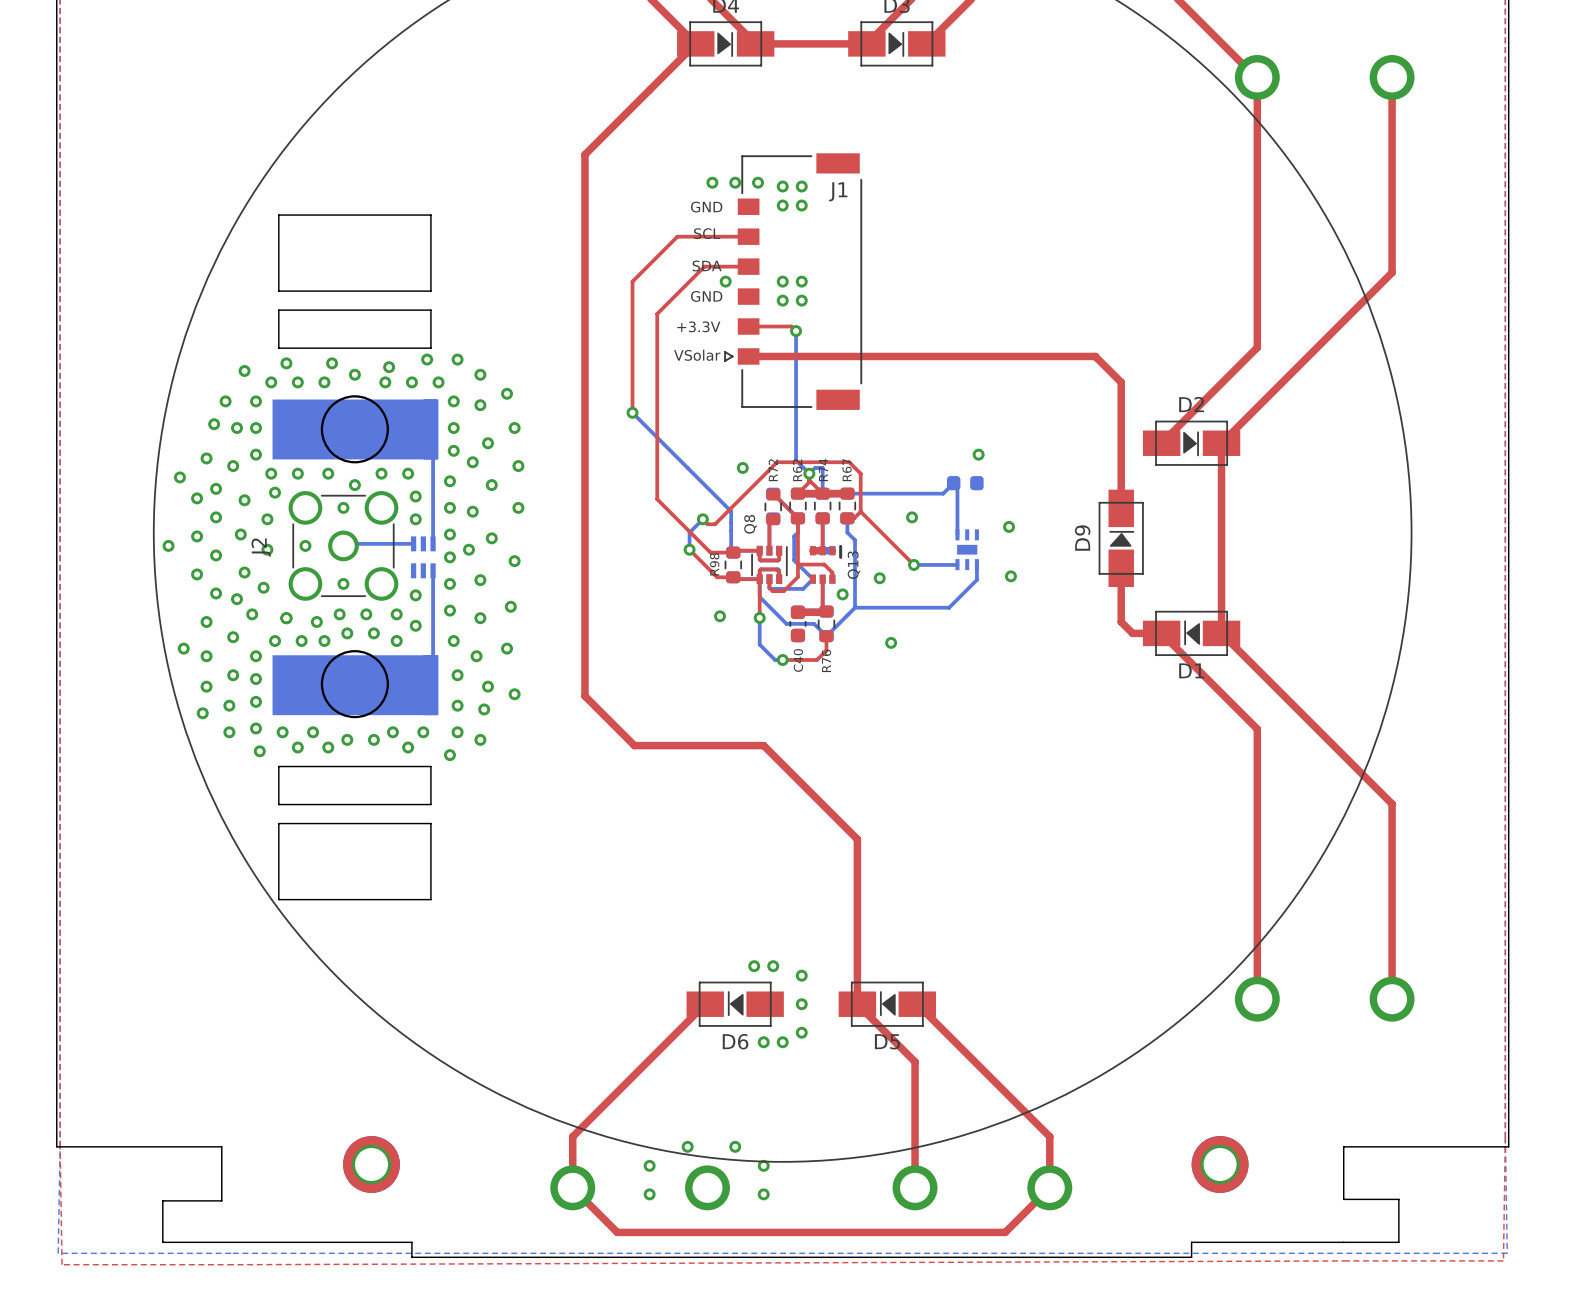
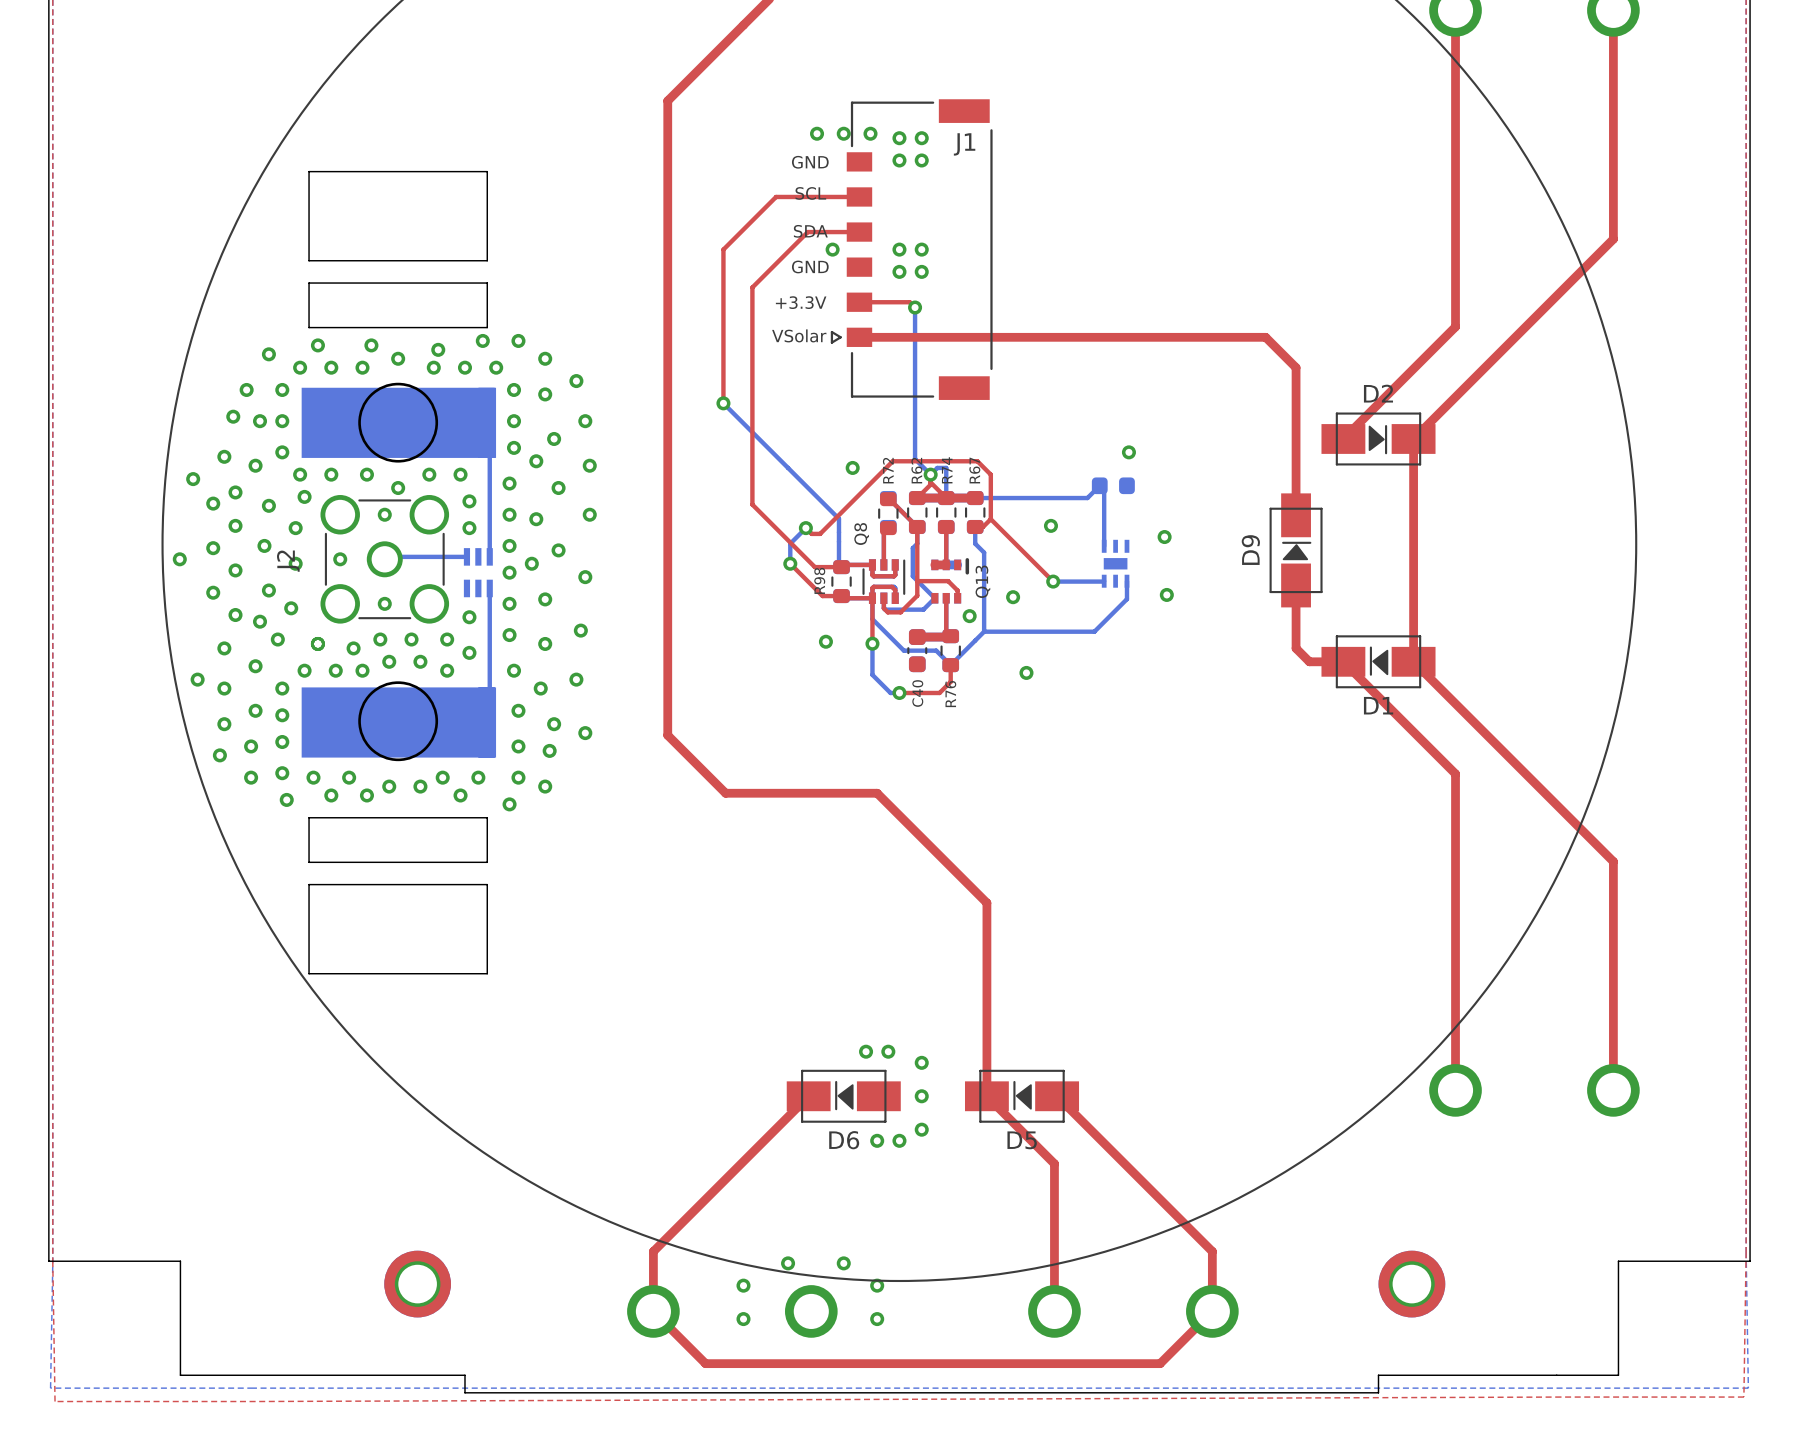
board edge: (56, 1145) (56, 1146) (221, 1146) (221, 1200) (162, 1200) (162, 1242) (169, 1242) -> (48, 1261) (180, 1261) (180, 1375)
board edge: (1508, 1145) (1508, 1146) (1343, 1146) (1343, 1199) (1398, 1199) (1398, 1242) (1396, 1242) -> (1750, 1261) (1618, 1261) (1618, 1375)

